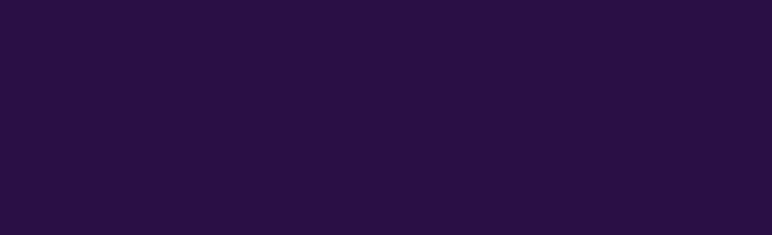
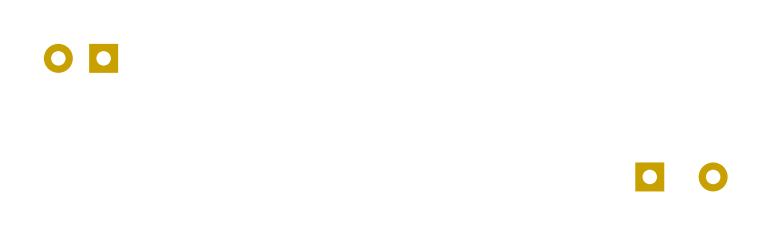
part: none -> (80, 58)
part: none -> (681, 176)

